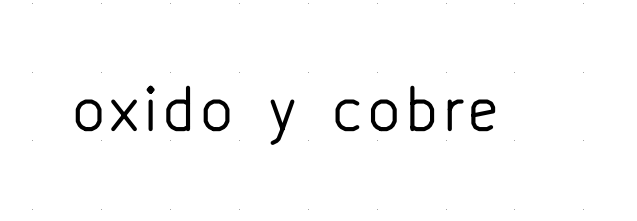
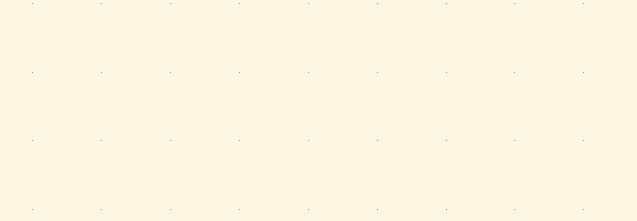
text: oxido y cobre (285, 115) -> none

